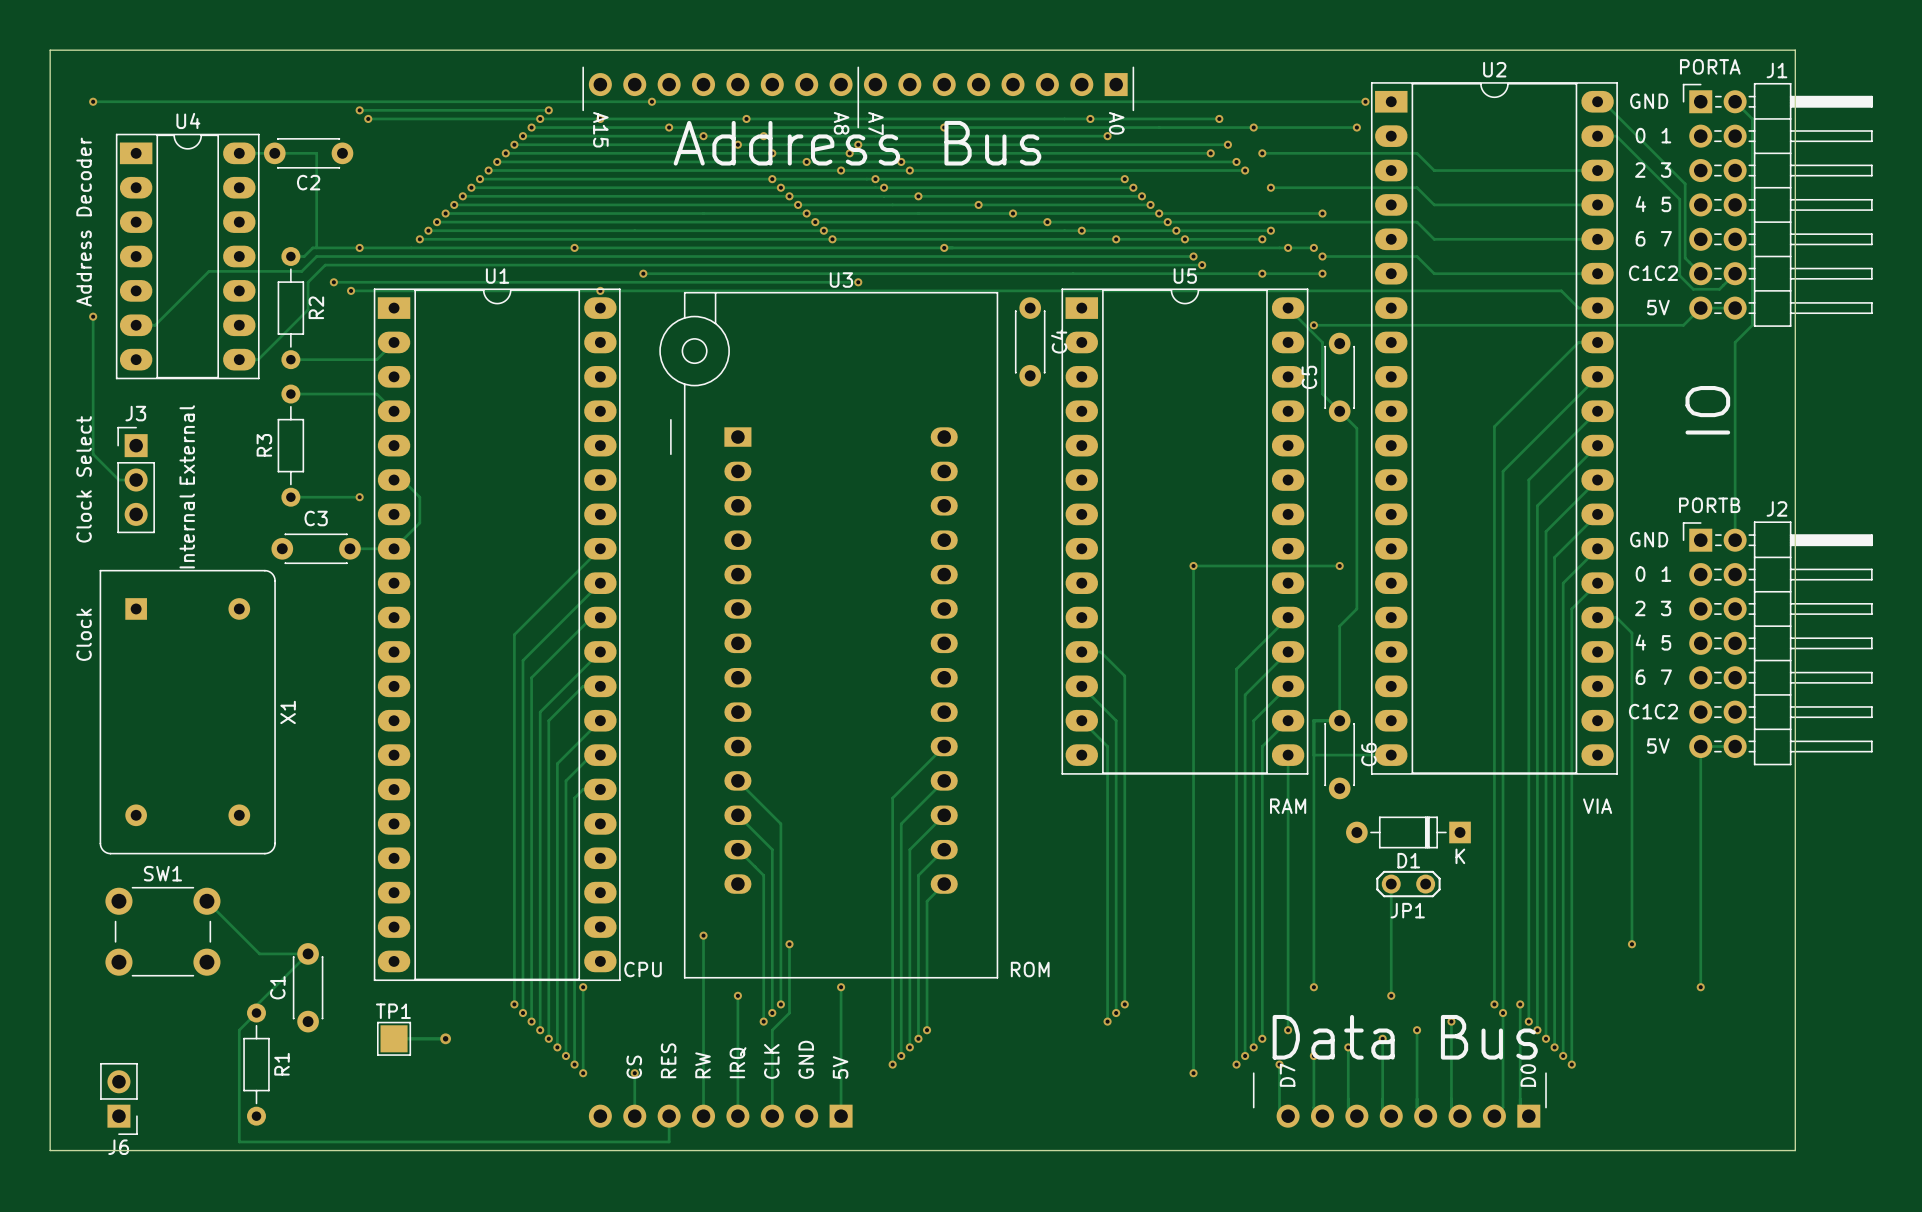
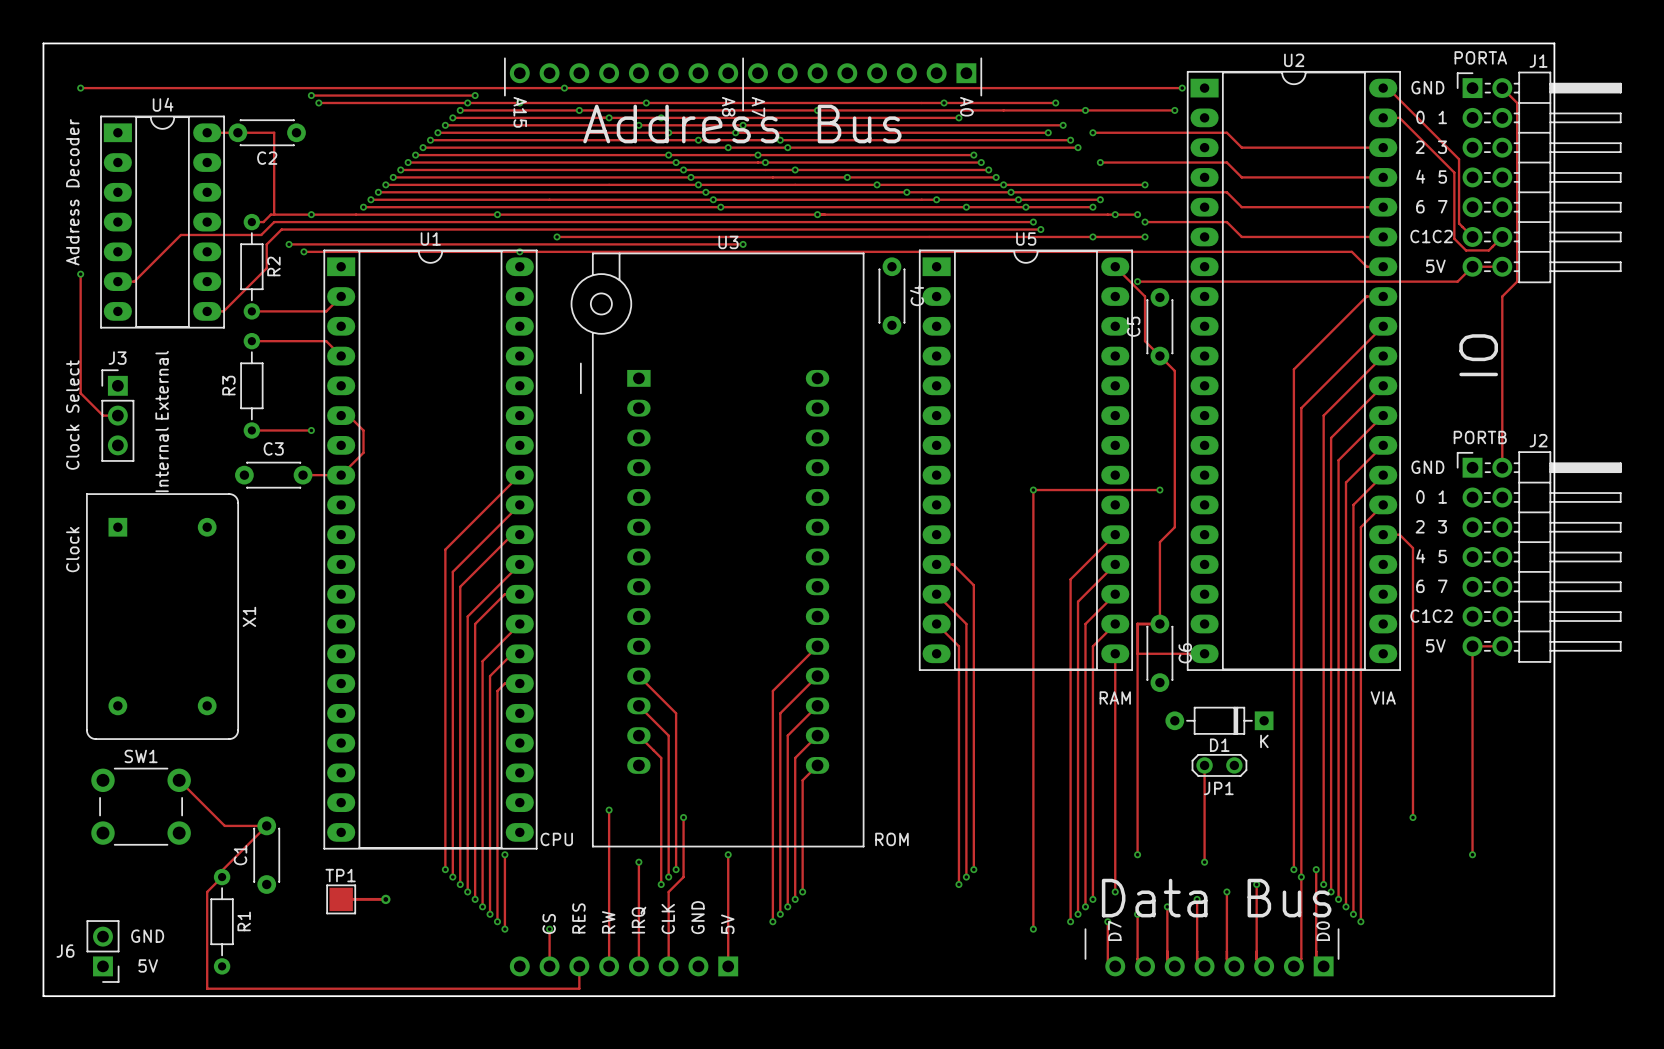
text: none -> GND (147, 936)
text: none -> 5V (148, 965)
J6 name position: J6 (118, 1147) -> J6 (65, 951)

